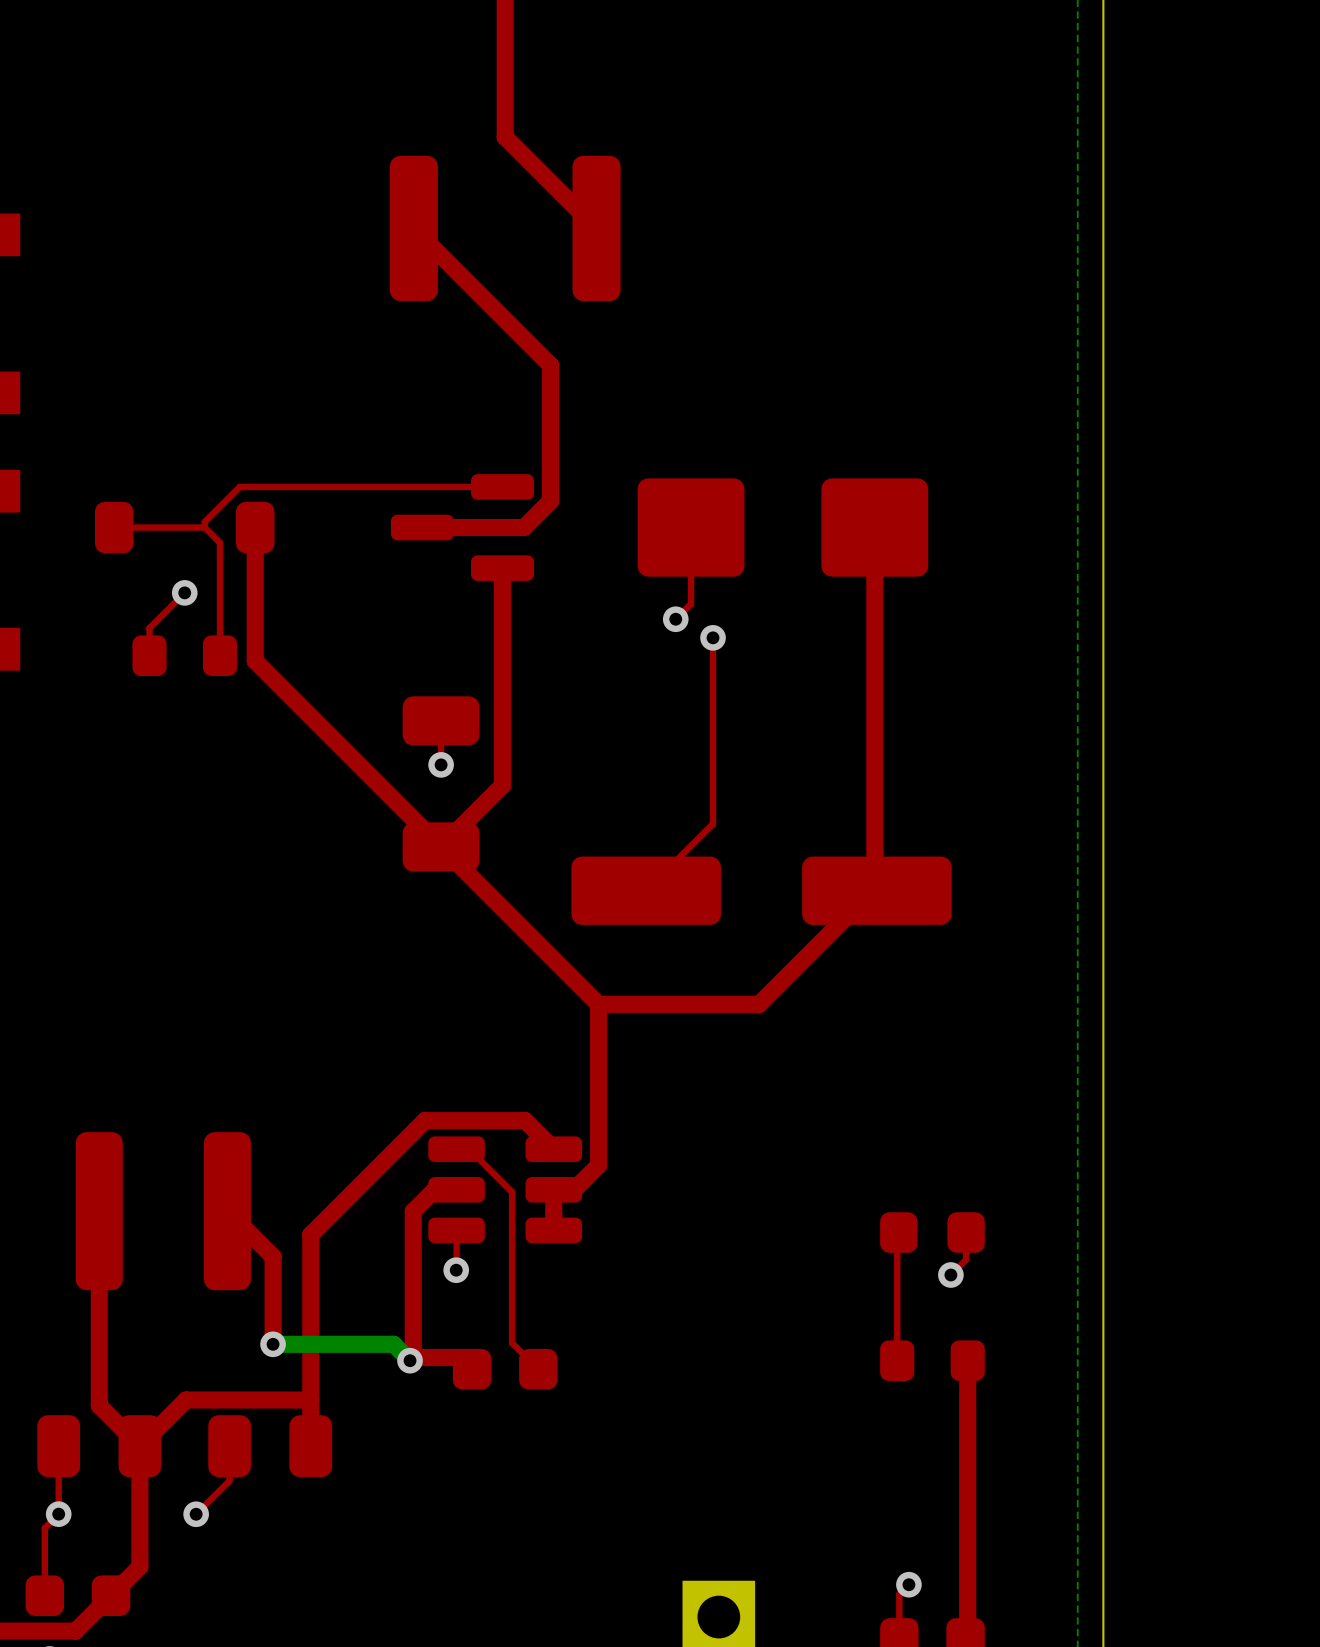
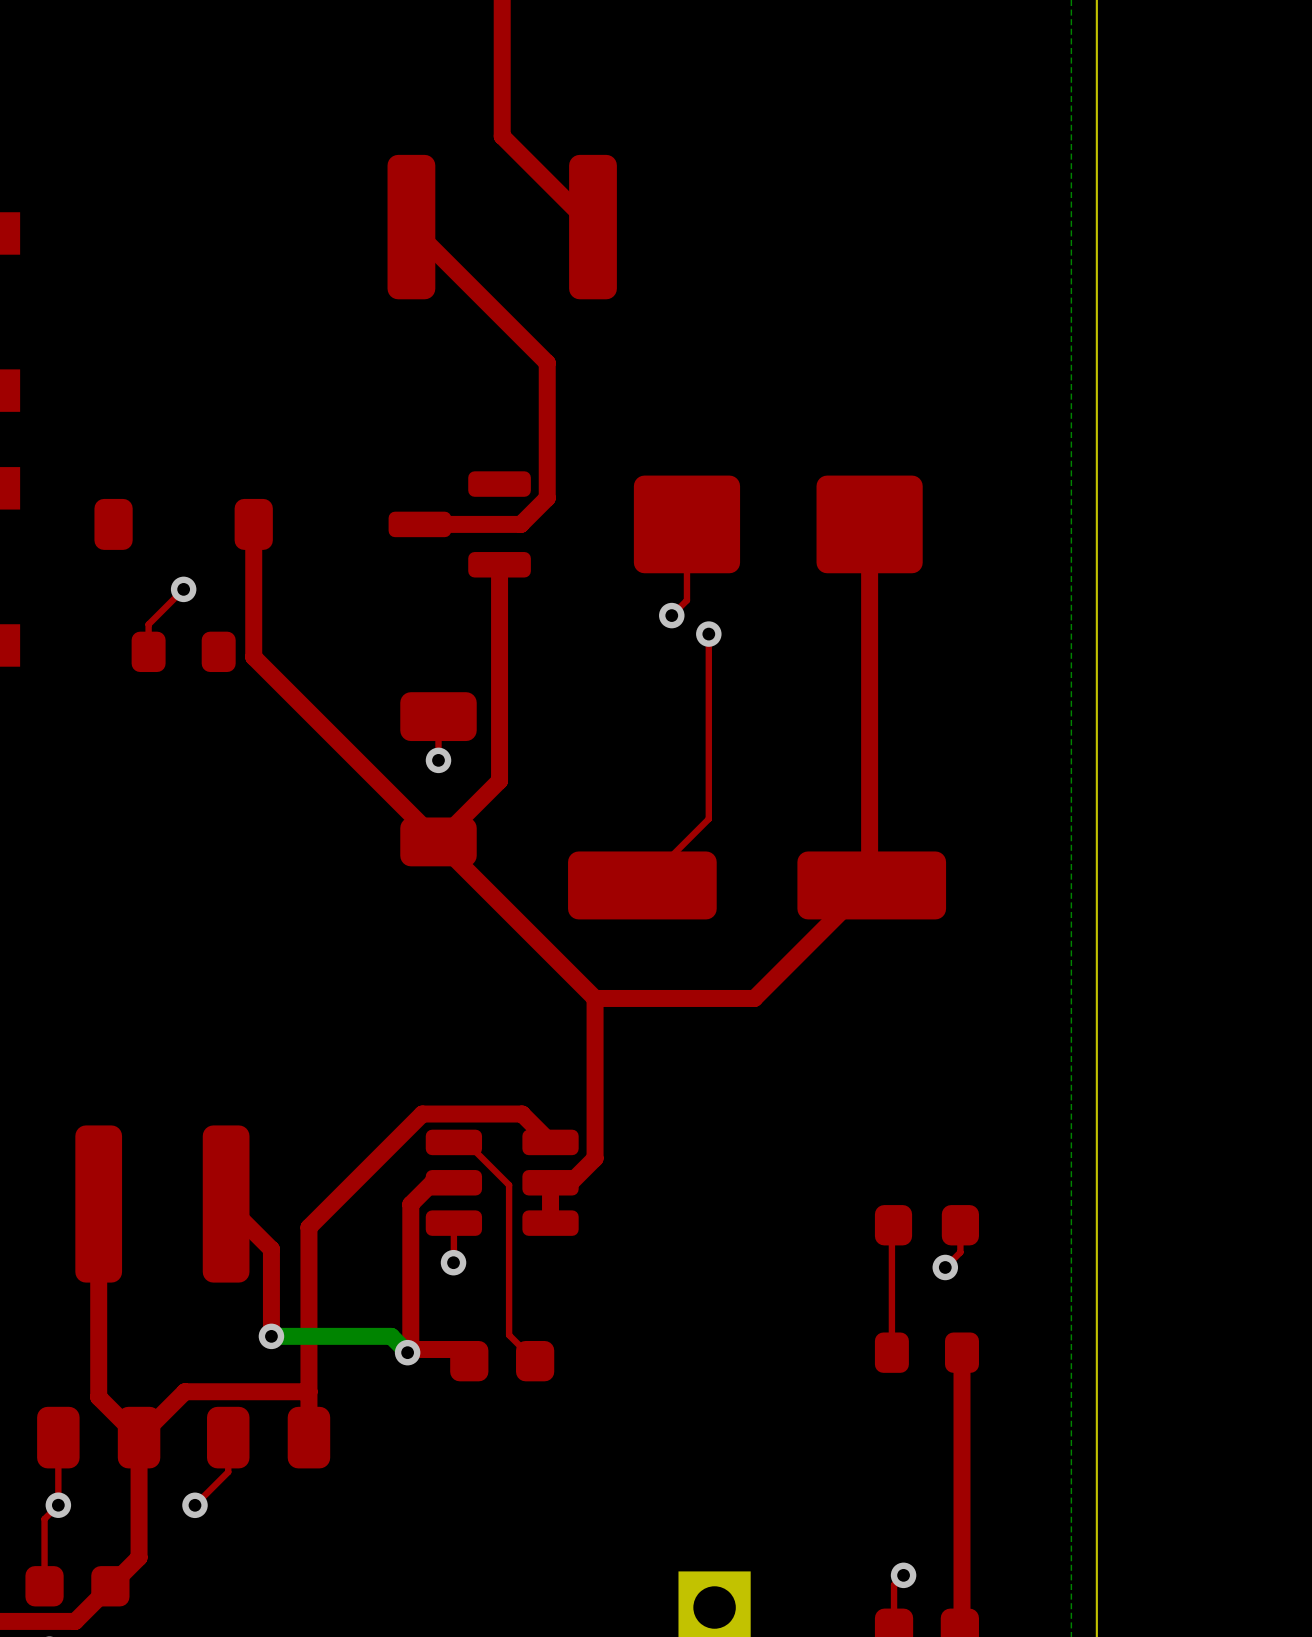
top track: (502, 486) (239, 486) (204, 521) (204, 527) -> none
top track: (204, 527) (219, 542) (219, 655) -> none
top track: (204, 527) (114, 527) -> none

